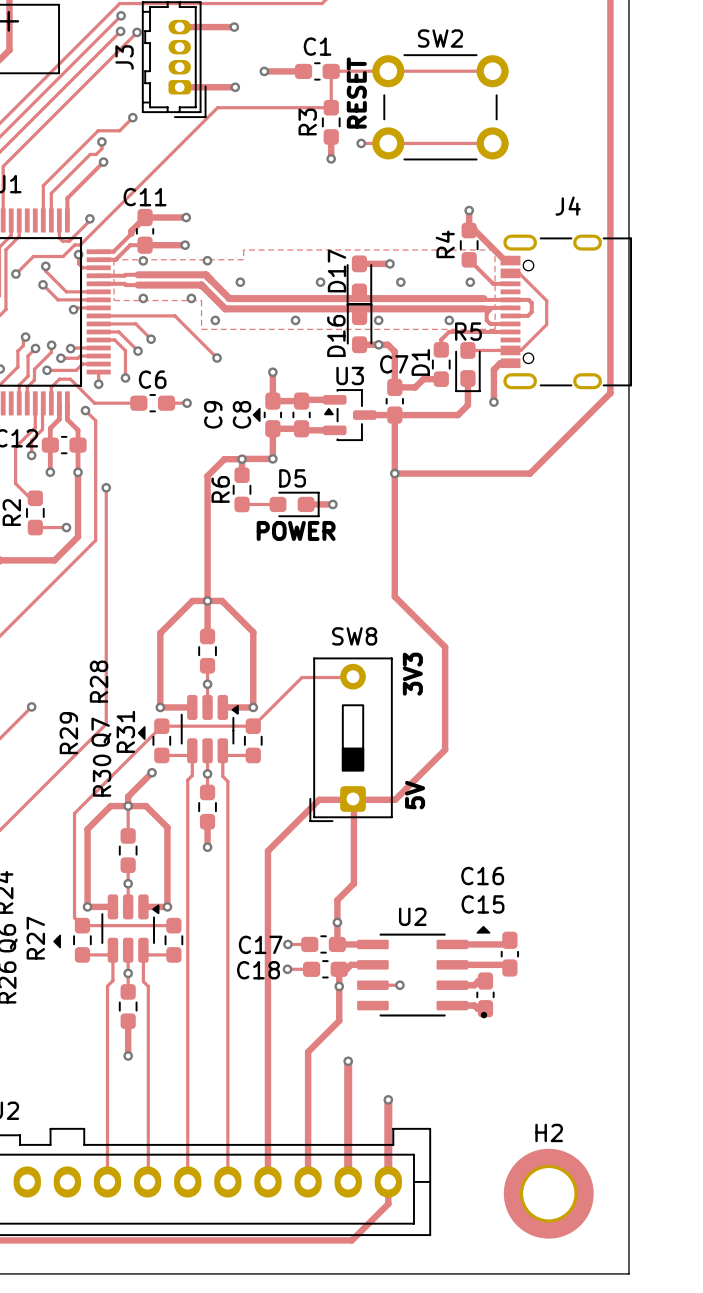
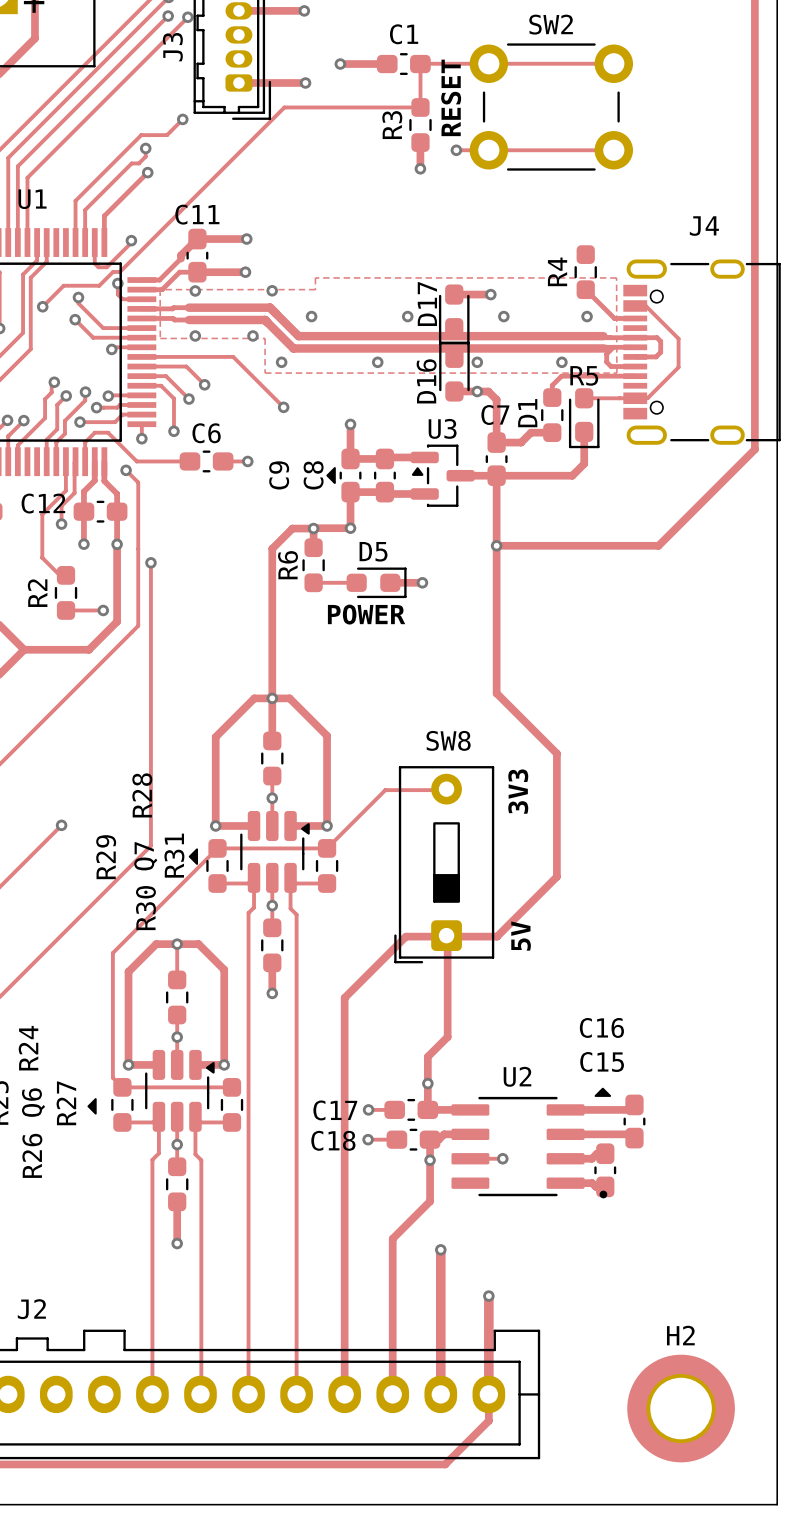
track: (469, 210) (469, 230) (474, 230) (504, 260) (510, 260) -> none
via: (469, 210) -> none
track: (510, 363) (500, 363) (493, 369) (493, 402) -> none
via: (493, 402) -> none
track: (152, 772) (128, 796) (128, 806) -> none
via: (152, 772) -> none

